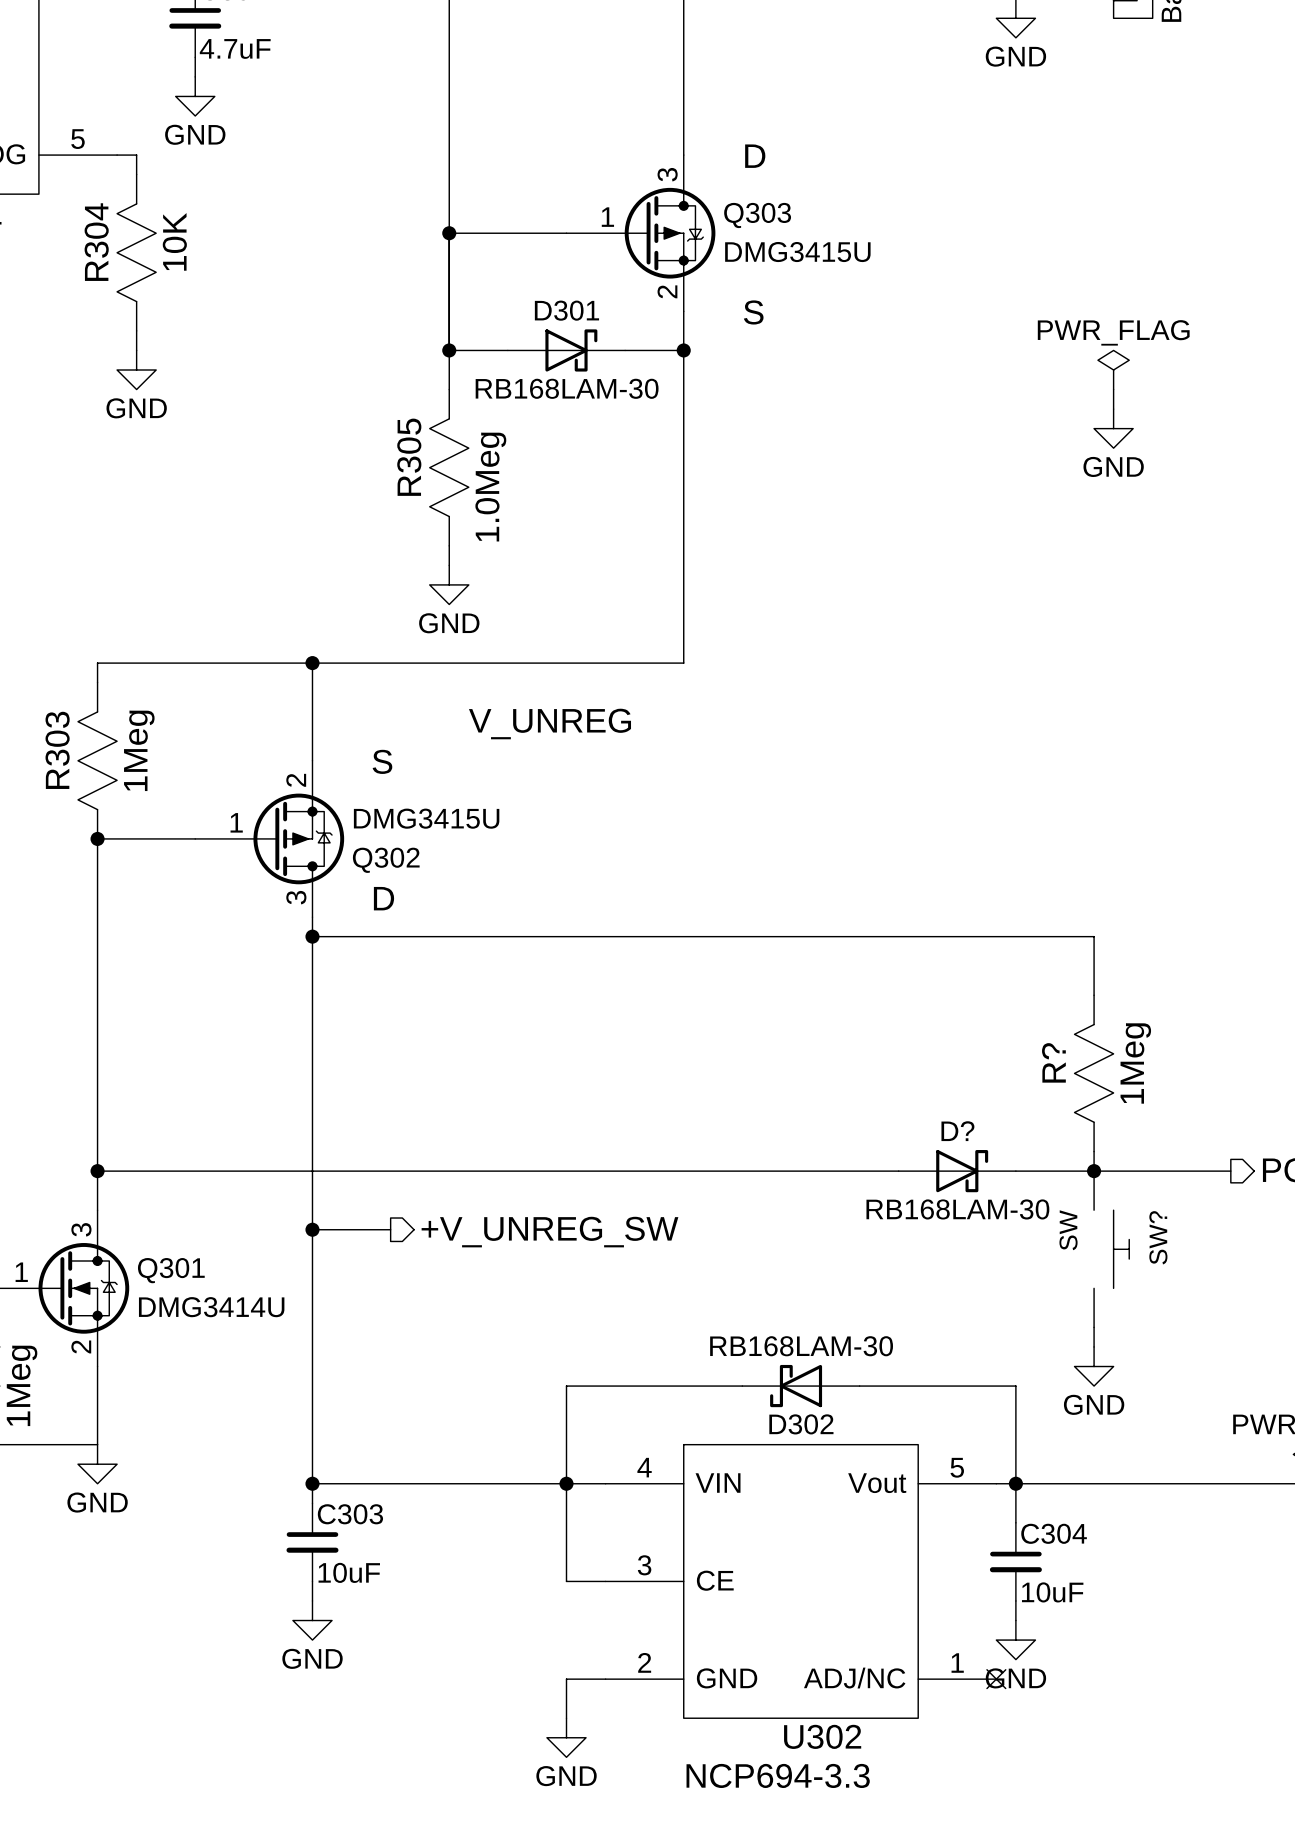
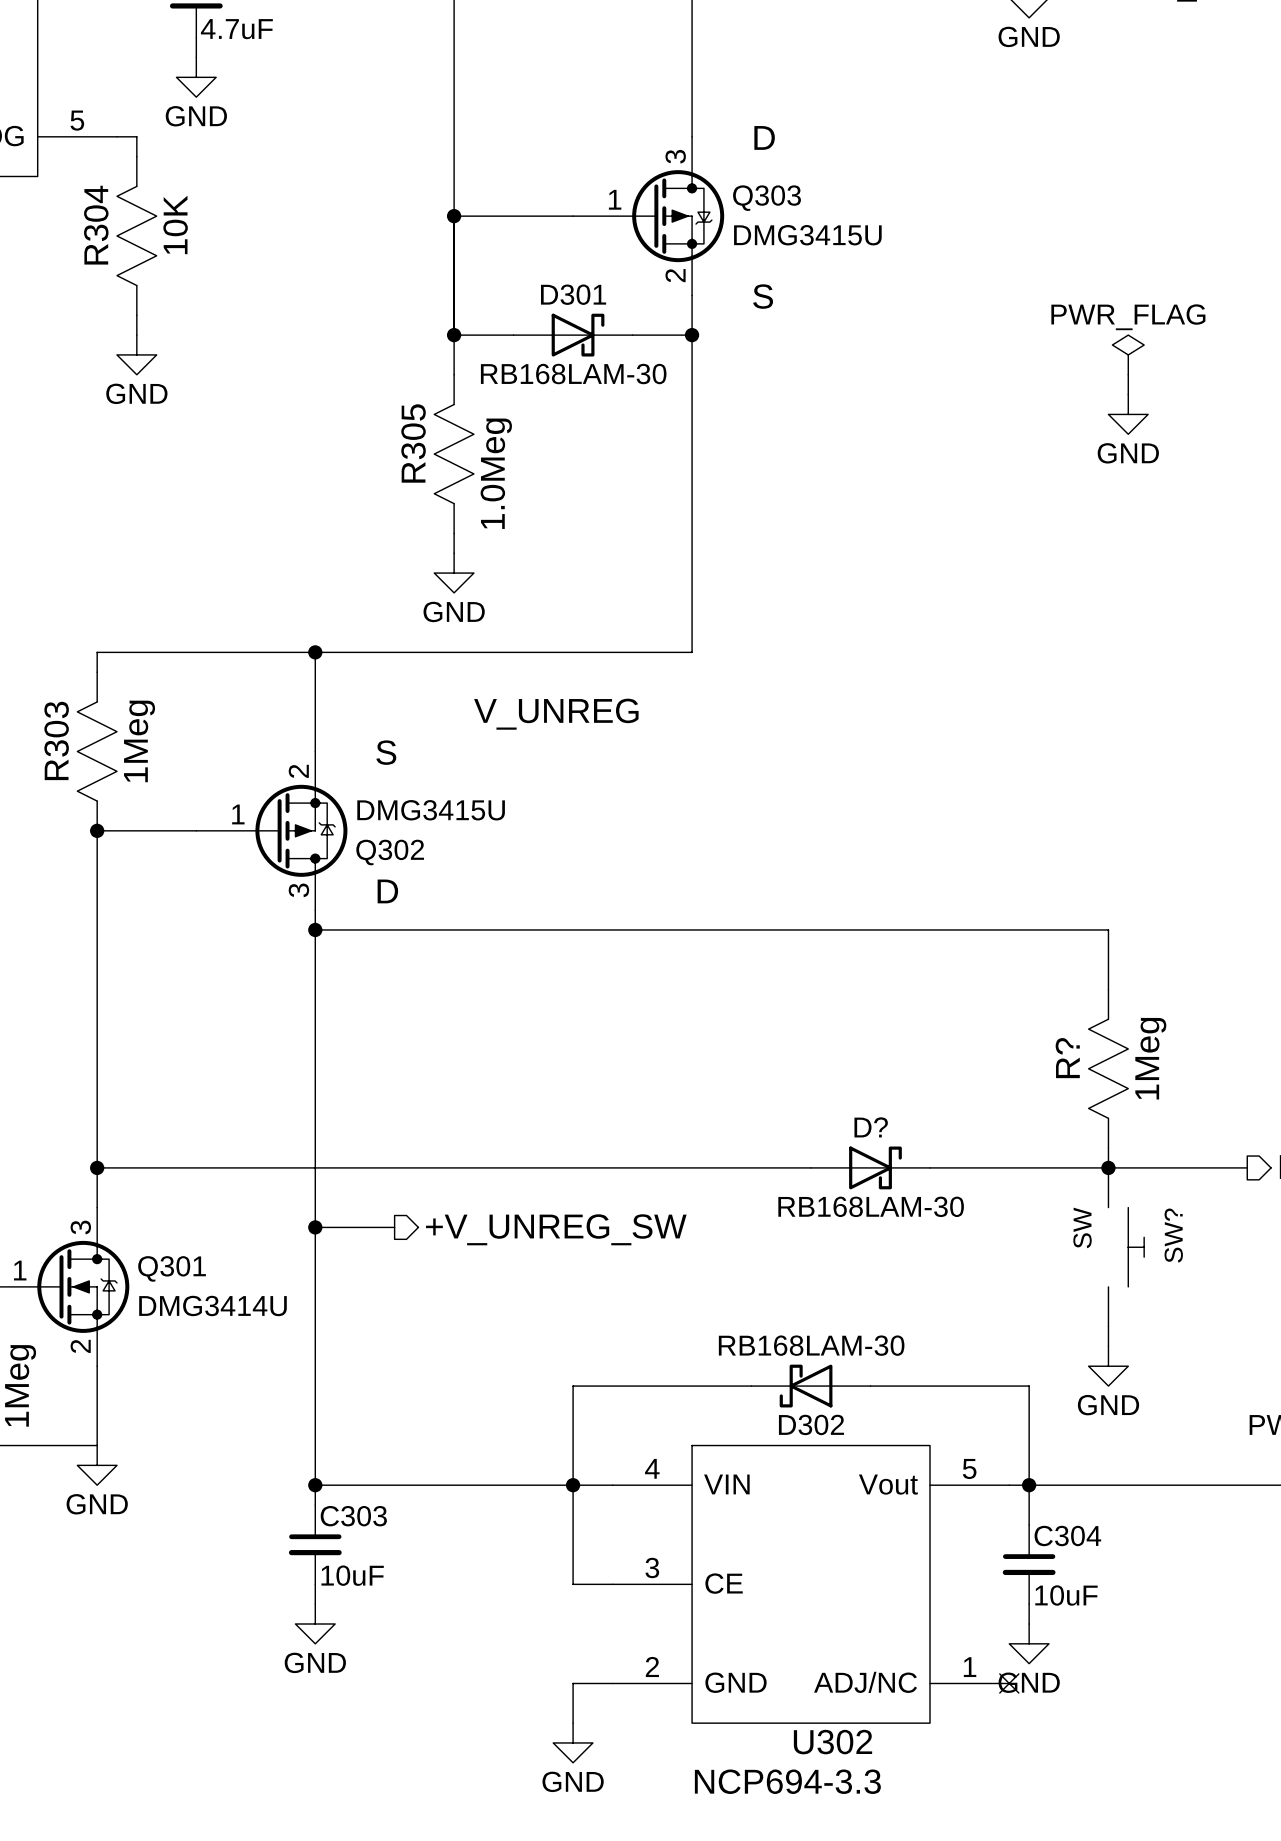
D? position: (957, 1171) -> (870, 1167)

